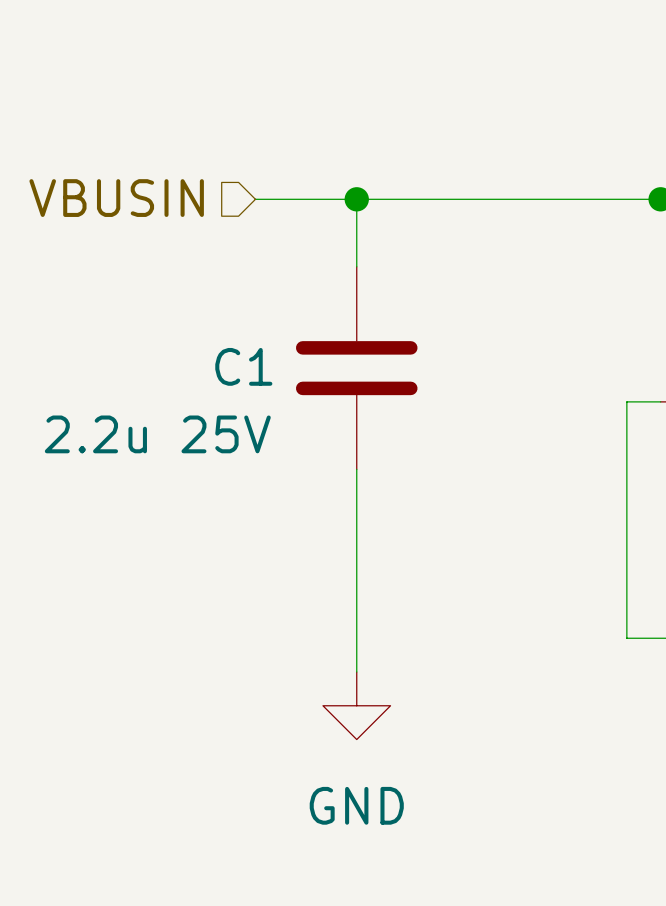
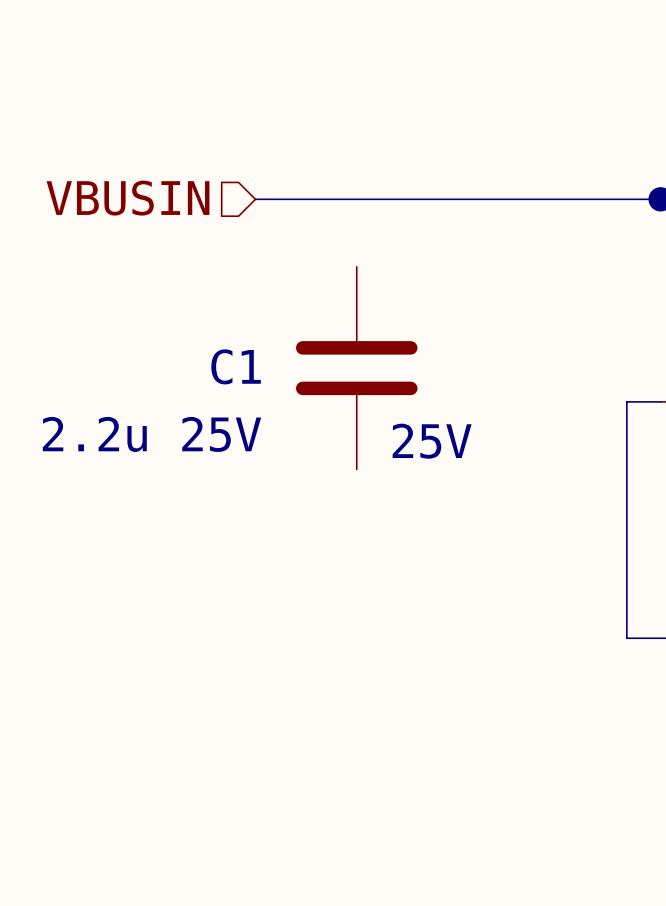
wire: (356, 199) (356, 266) -> none
junction: (356, 199) -> none
C1 text: none -> 25V (432, 441)
wire: (356, 469) (356, 672) -> none
power symbol: GND (356, 705) -> none

